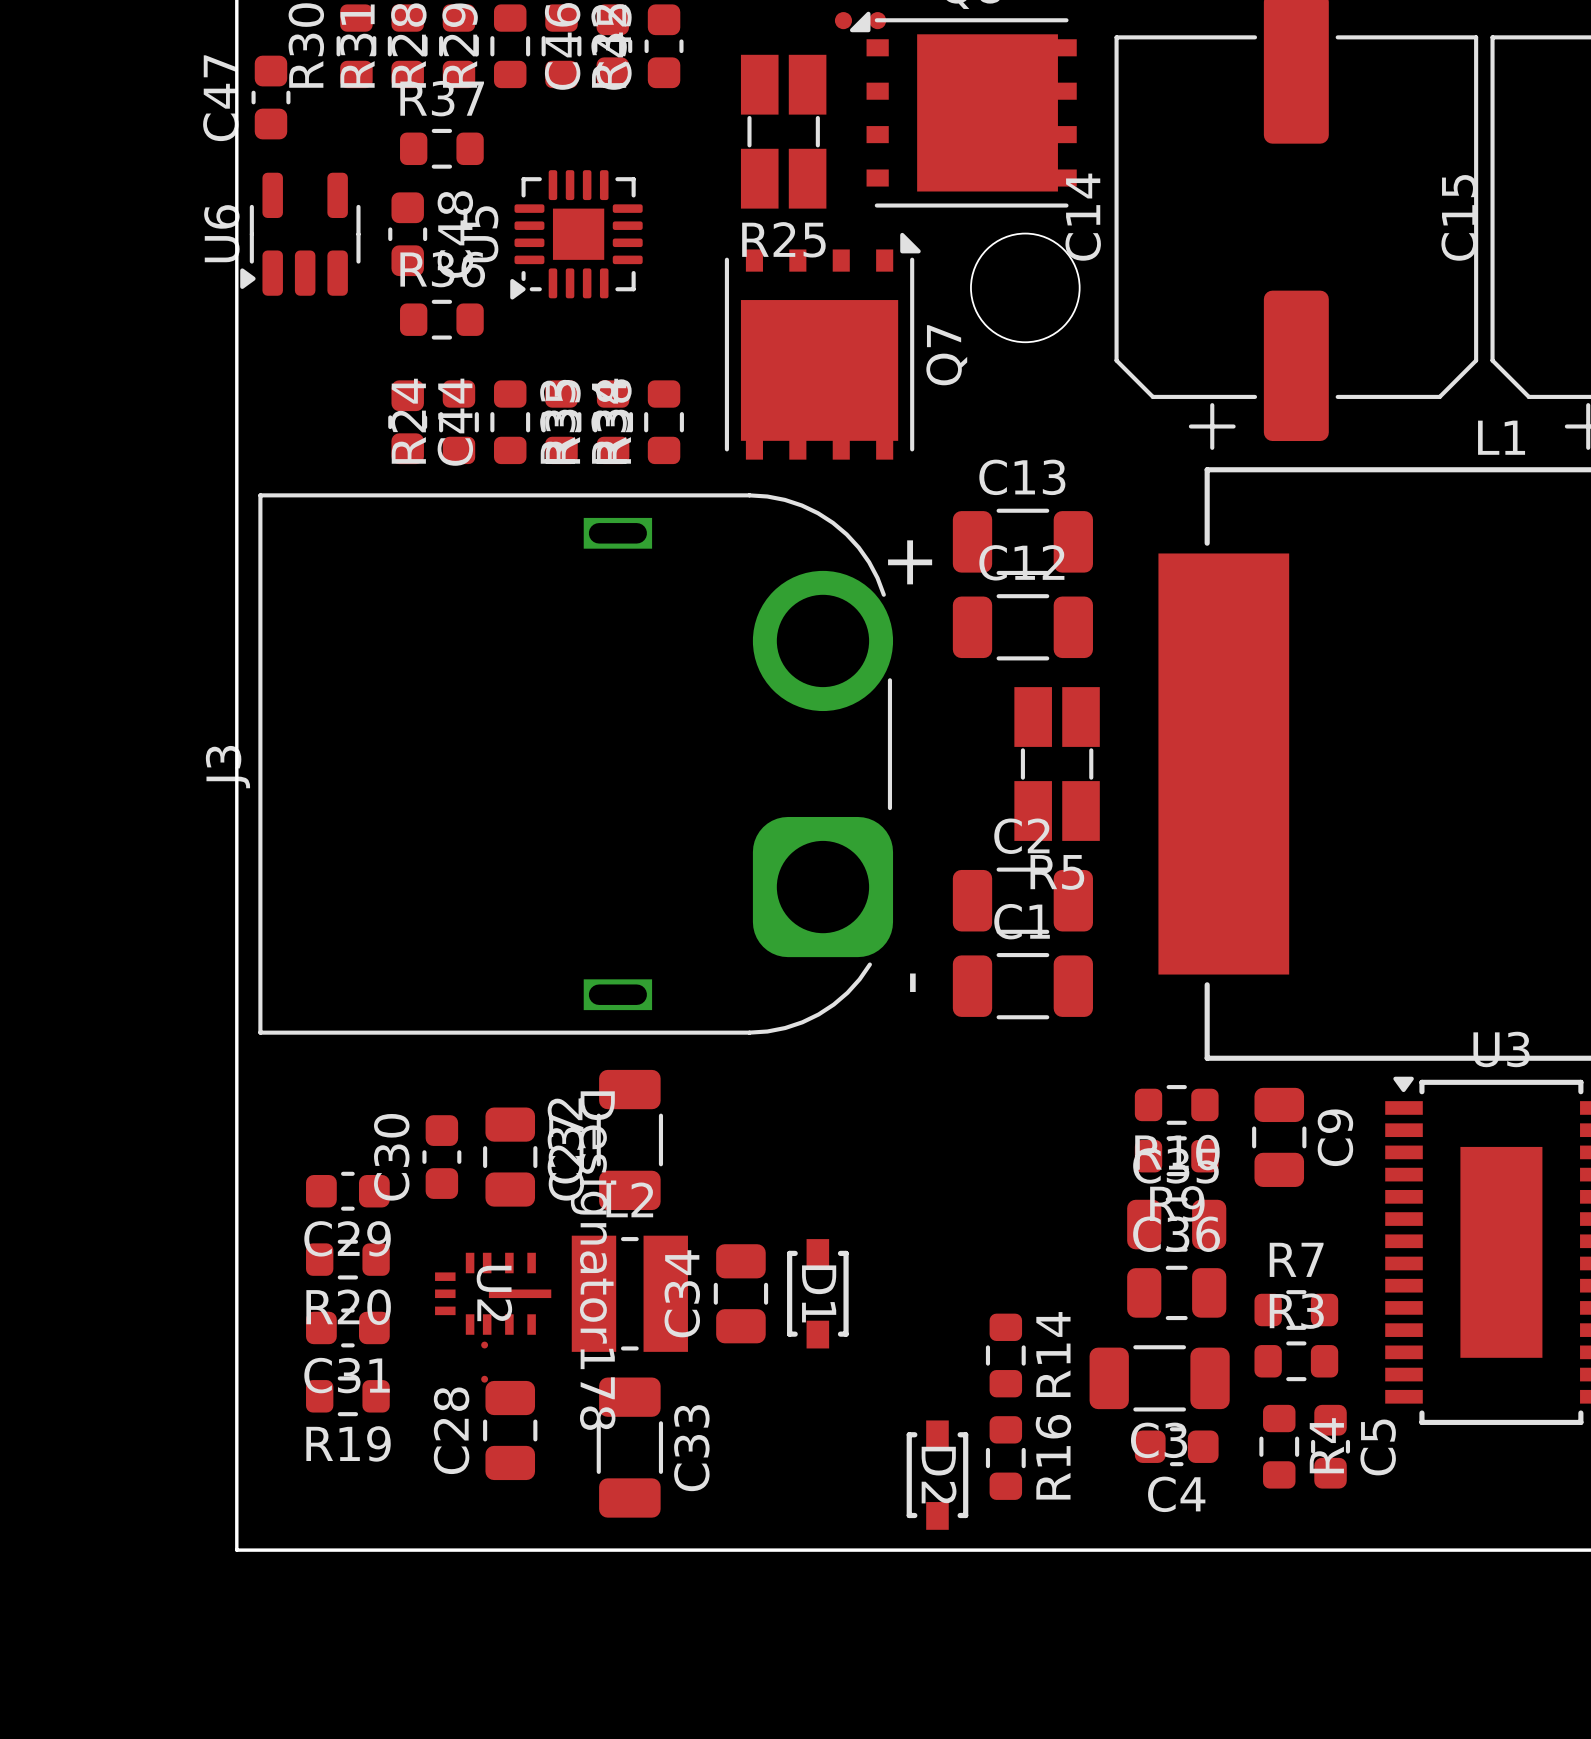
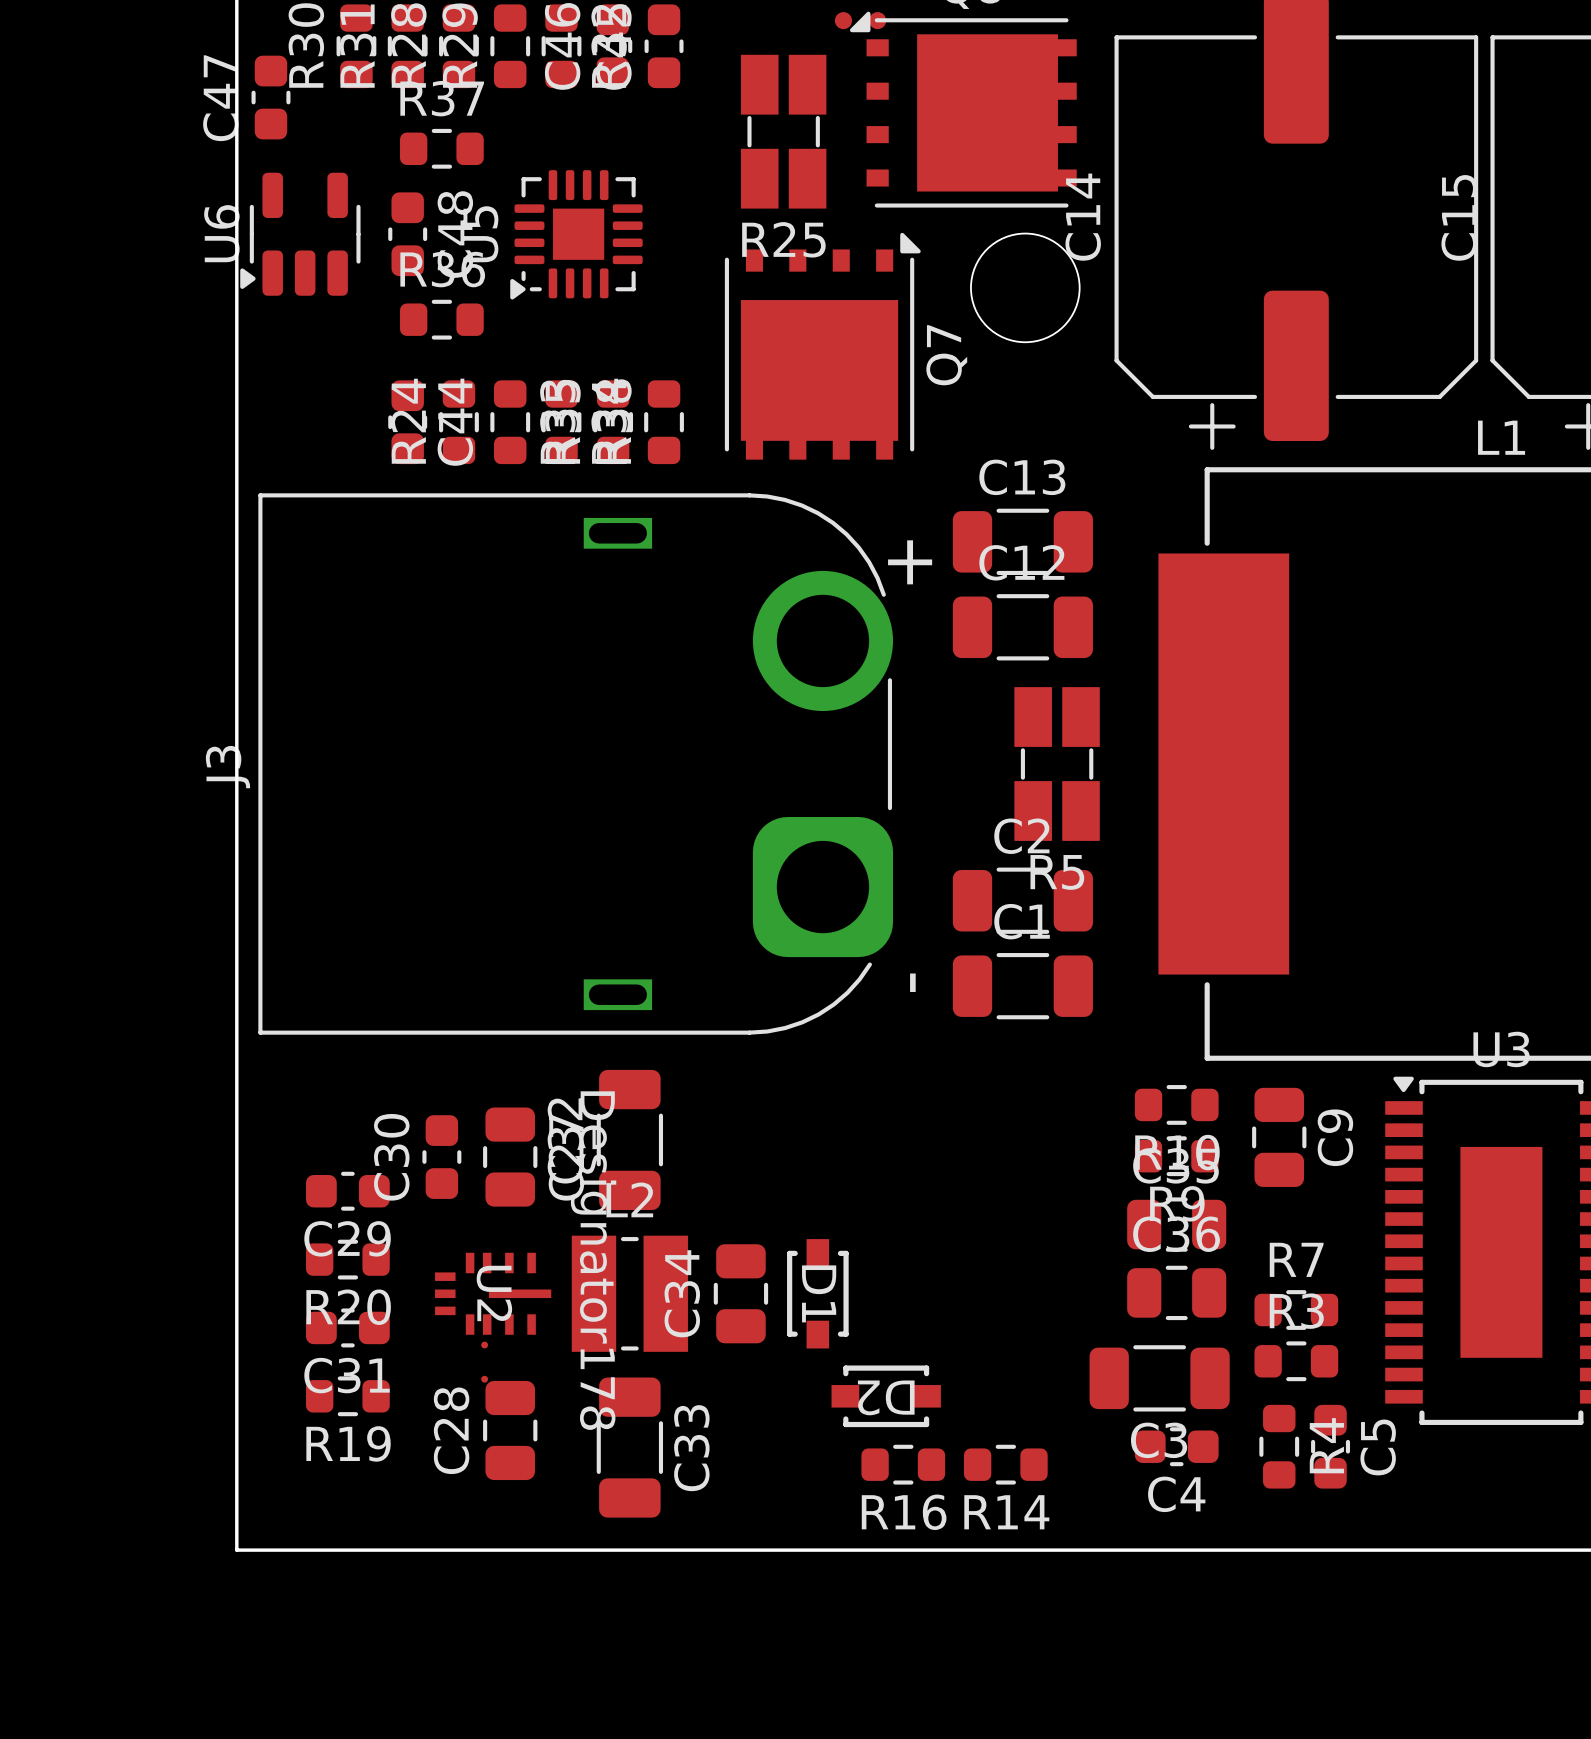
R14 rotation: 0° (1005, 1355) -> 90° clockwise (1005, 1464)
R14 position: (1005, 1355) -> (1005, 1464)
R16 rotation: 0° (1005, 1458) -> 90° clockwise (903, 1464)
R16 position: (1005, 1458) -> (903, 1464)
D2 rotation: 0° (937, 1475) -> 90° clockwise (886, 1396)
D2 position: (937, 1475) -> (886, 1396)

